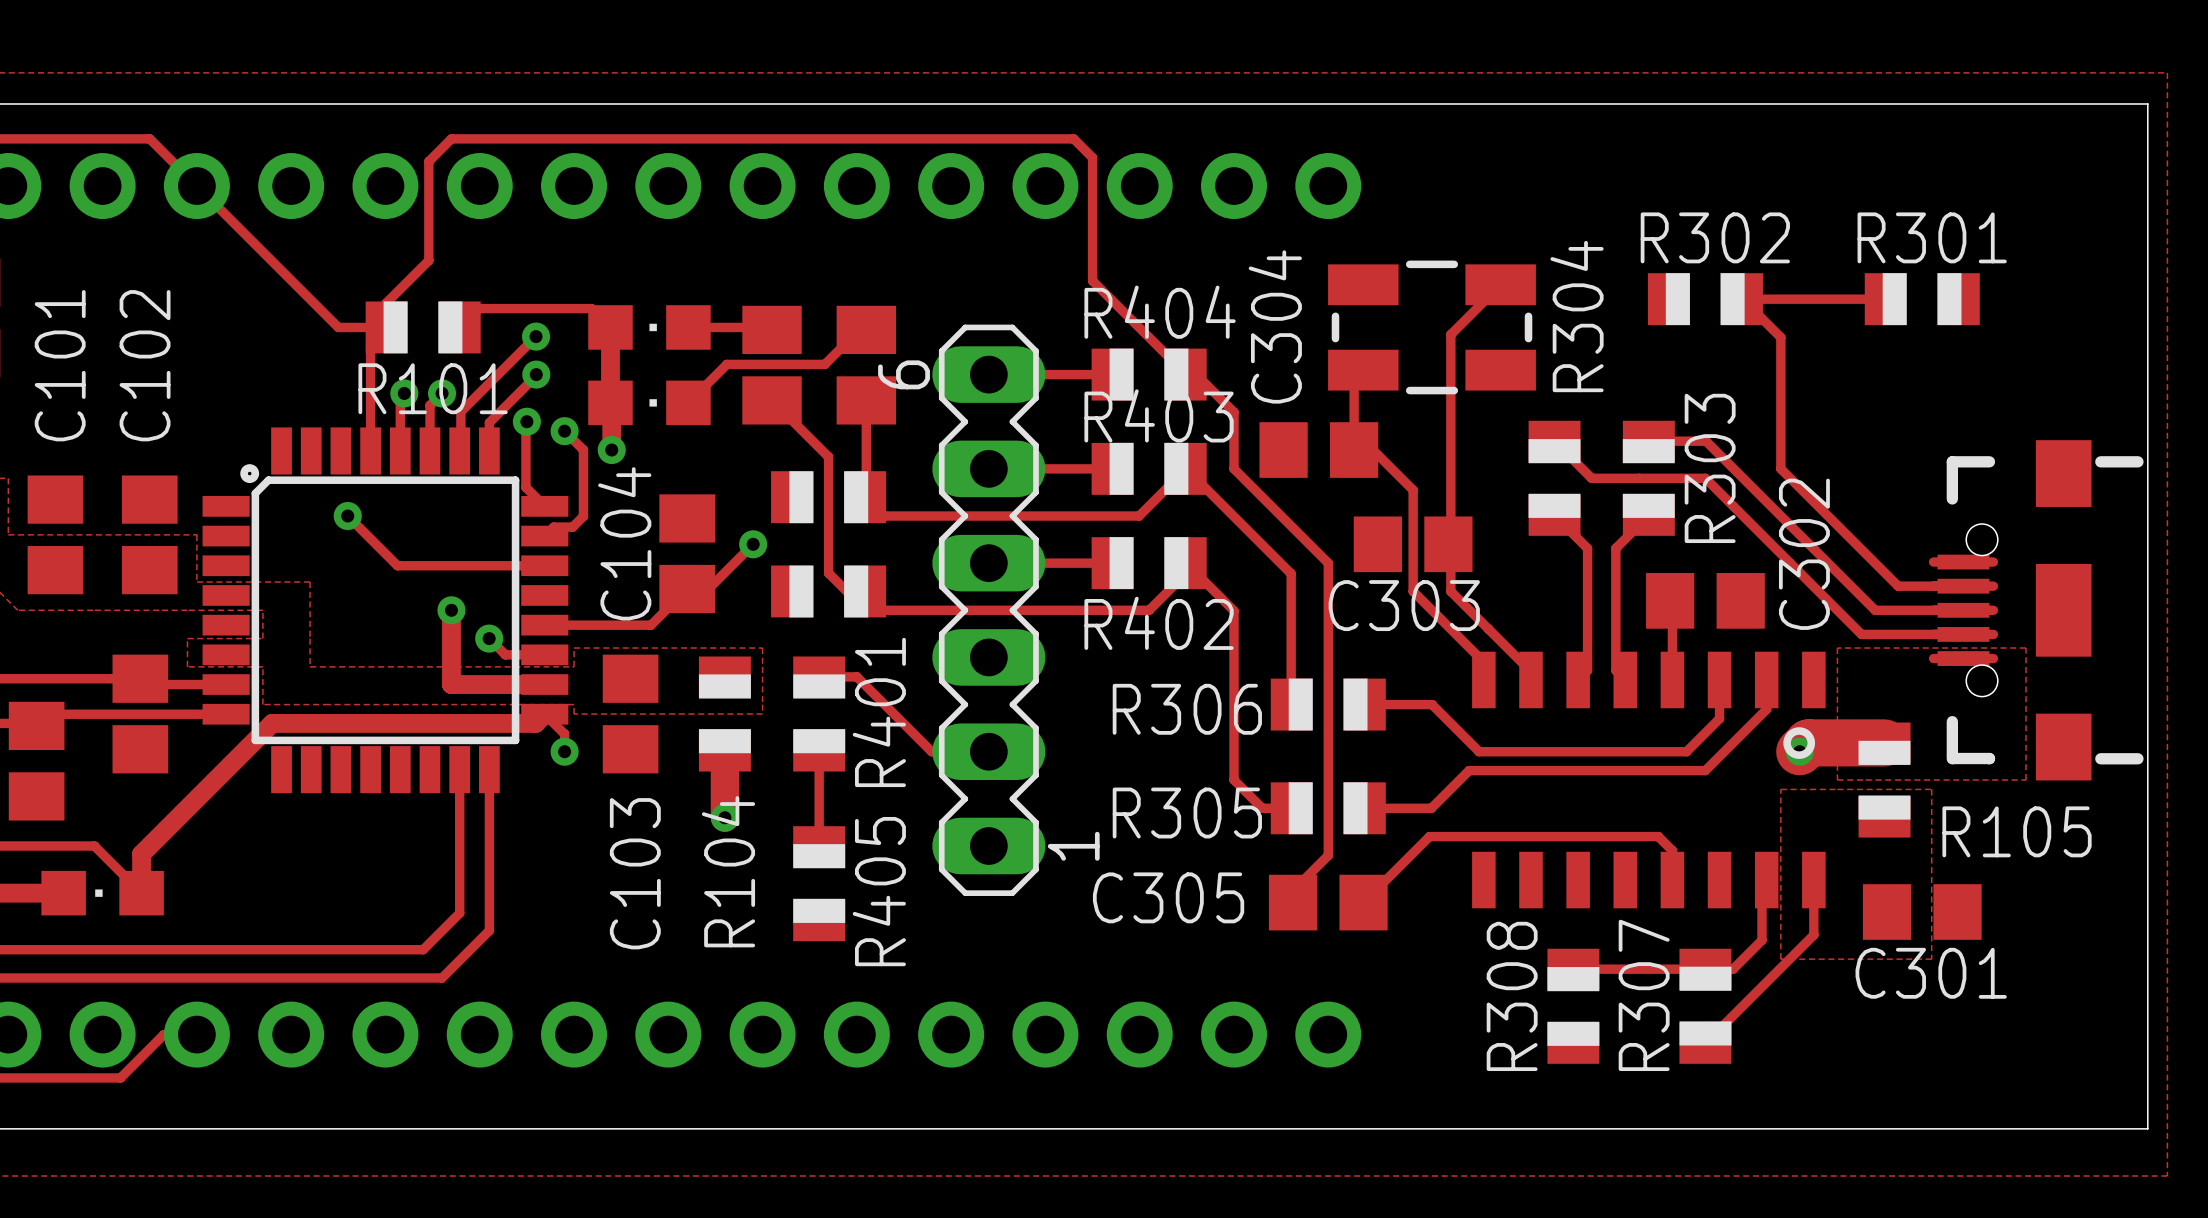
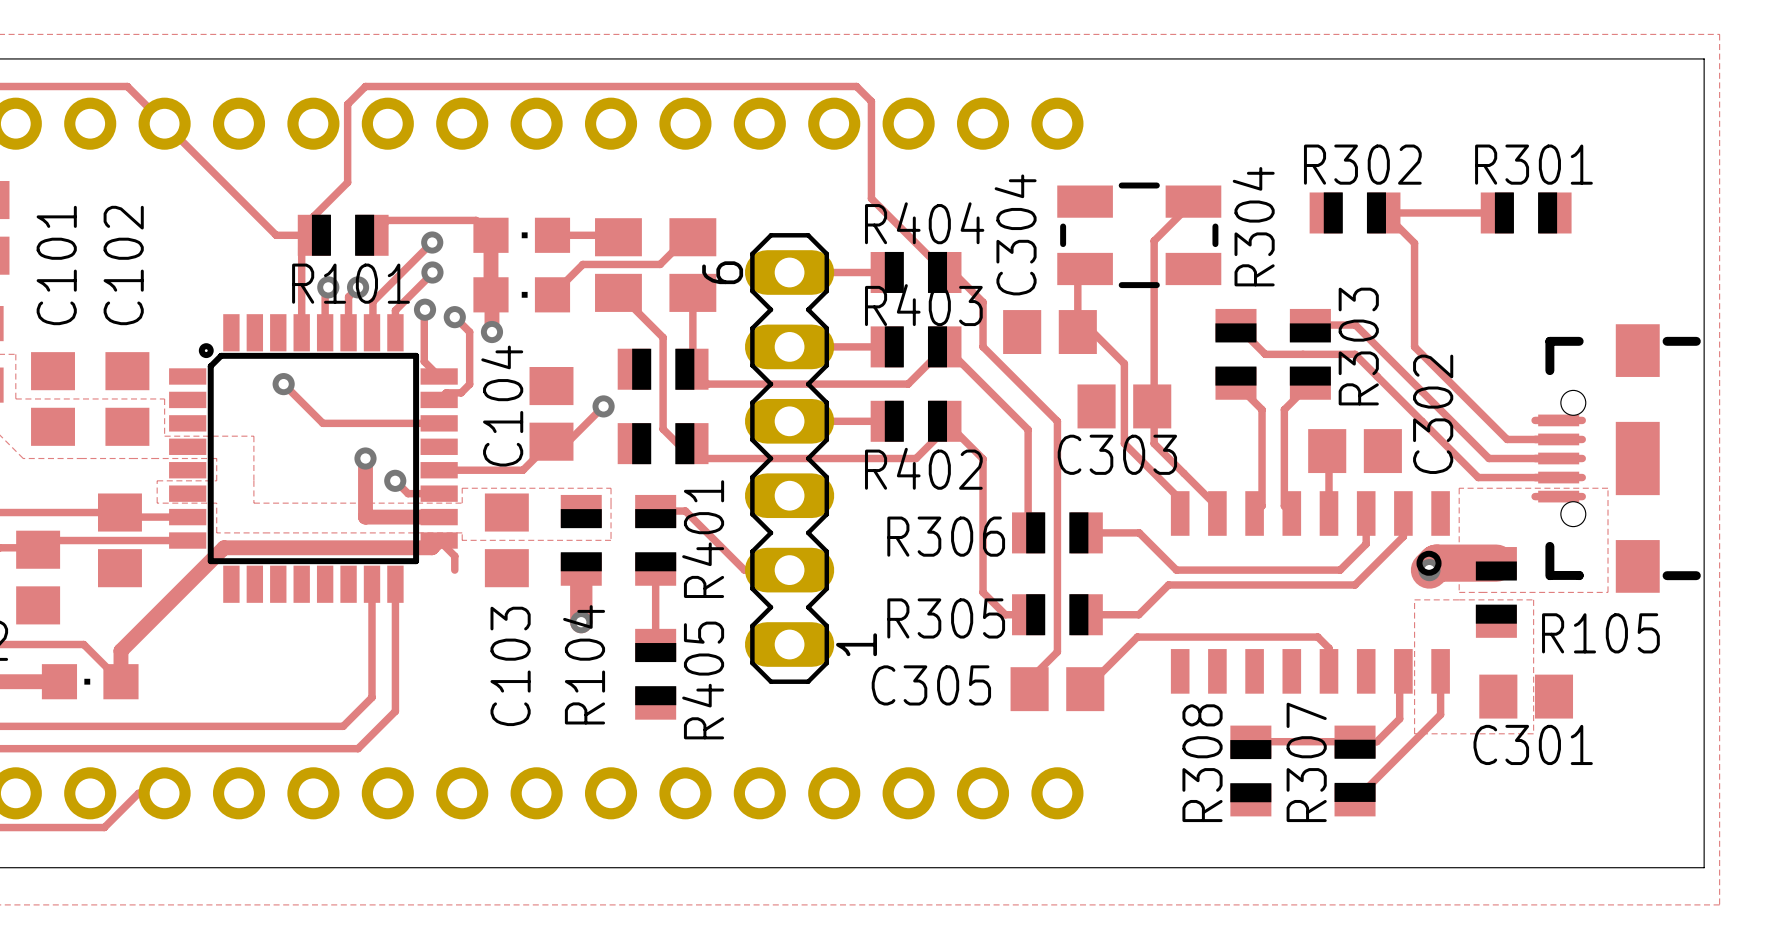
via: (564, 751) -> none

